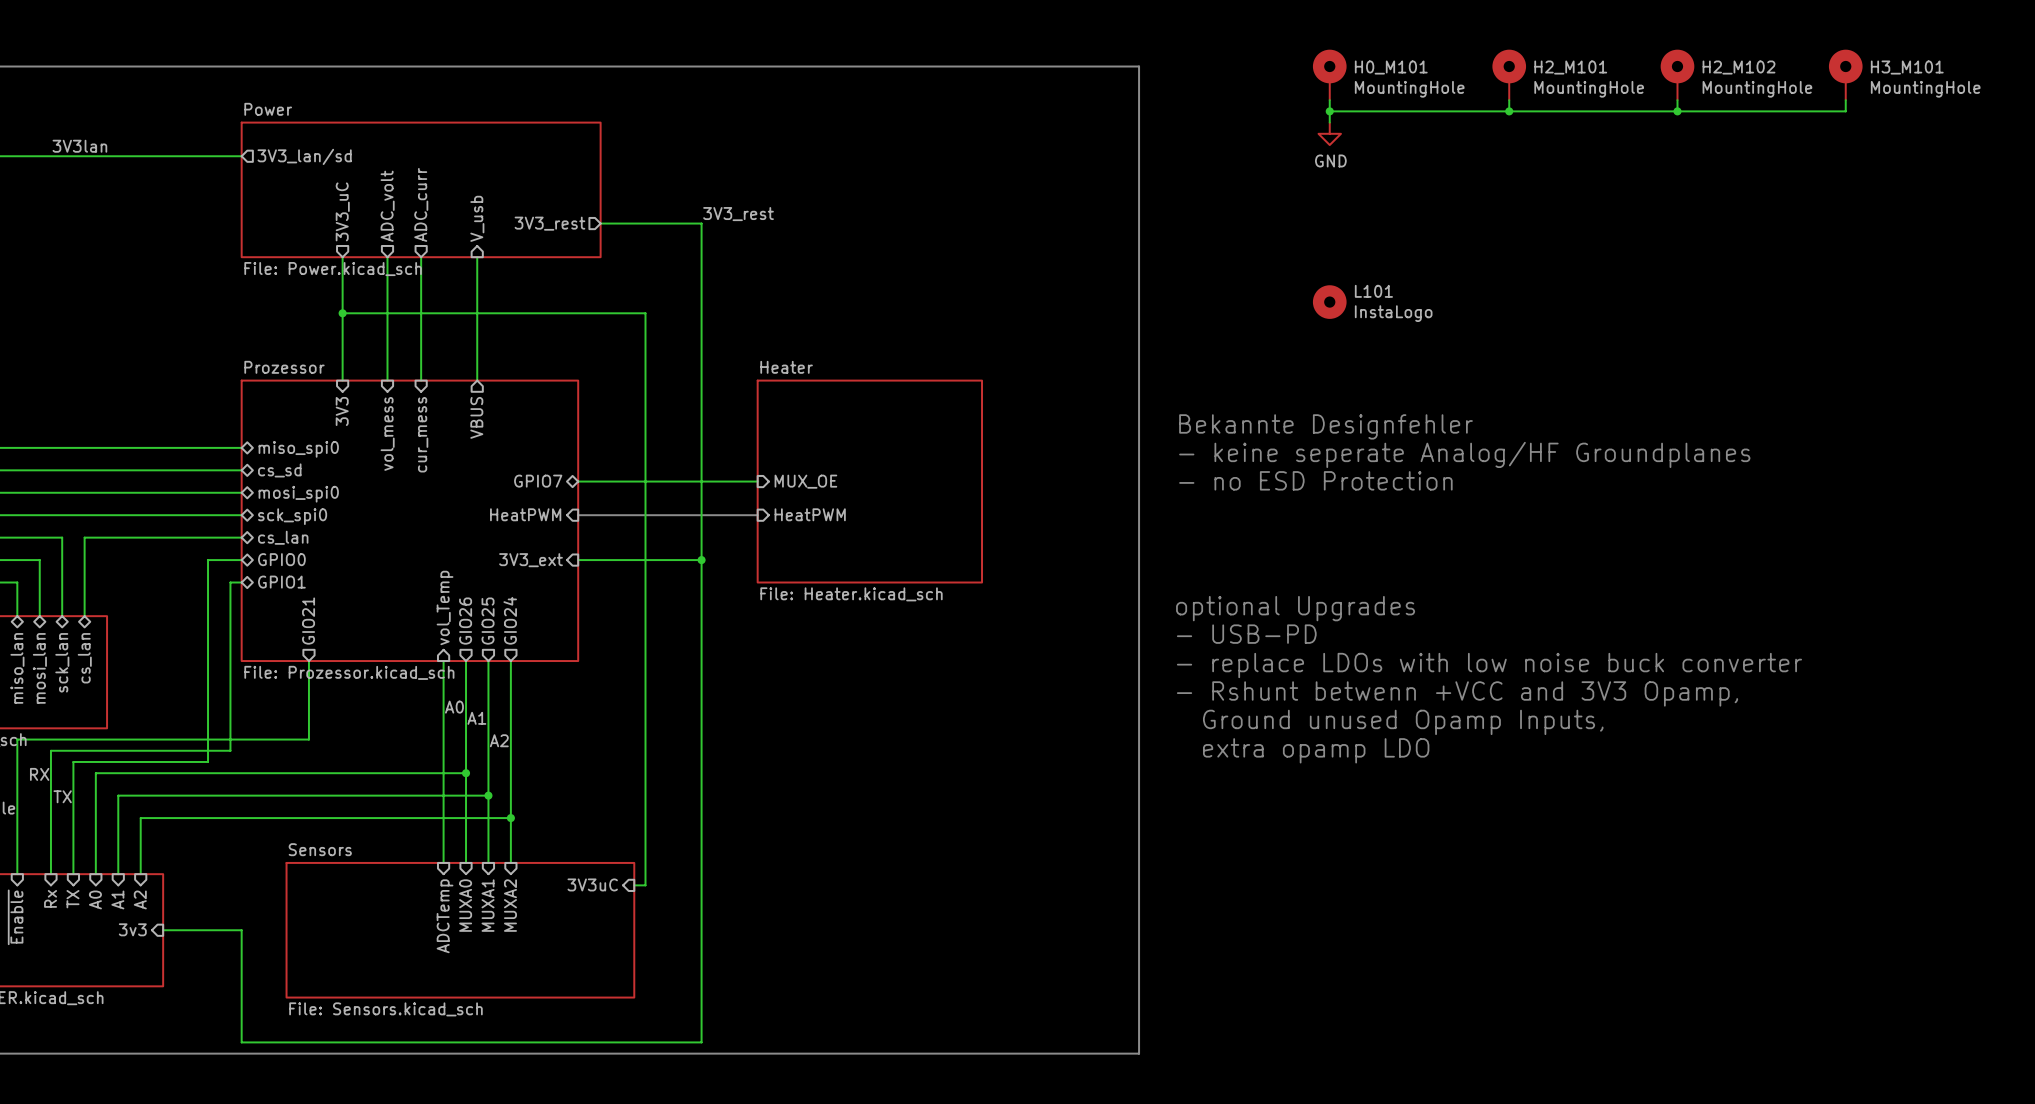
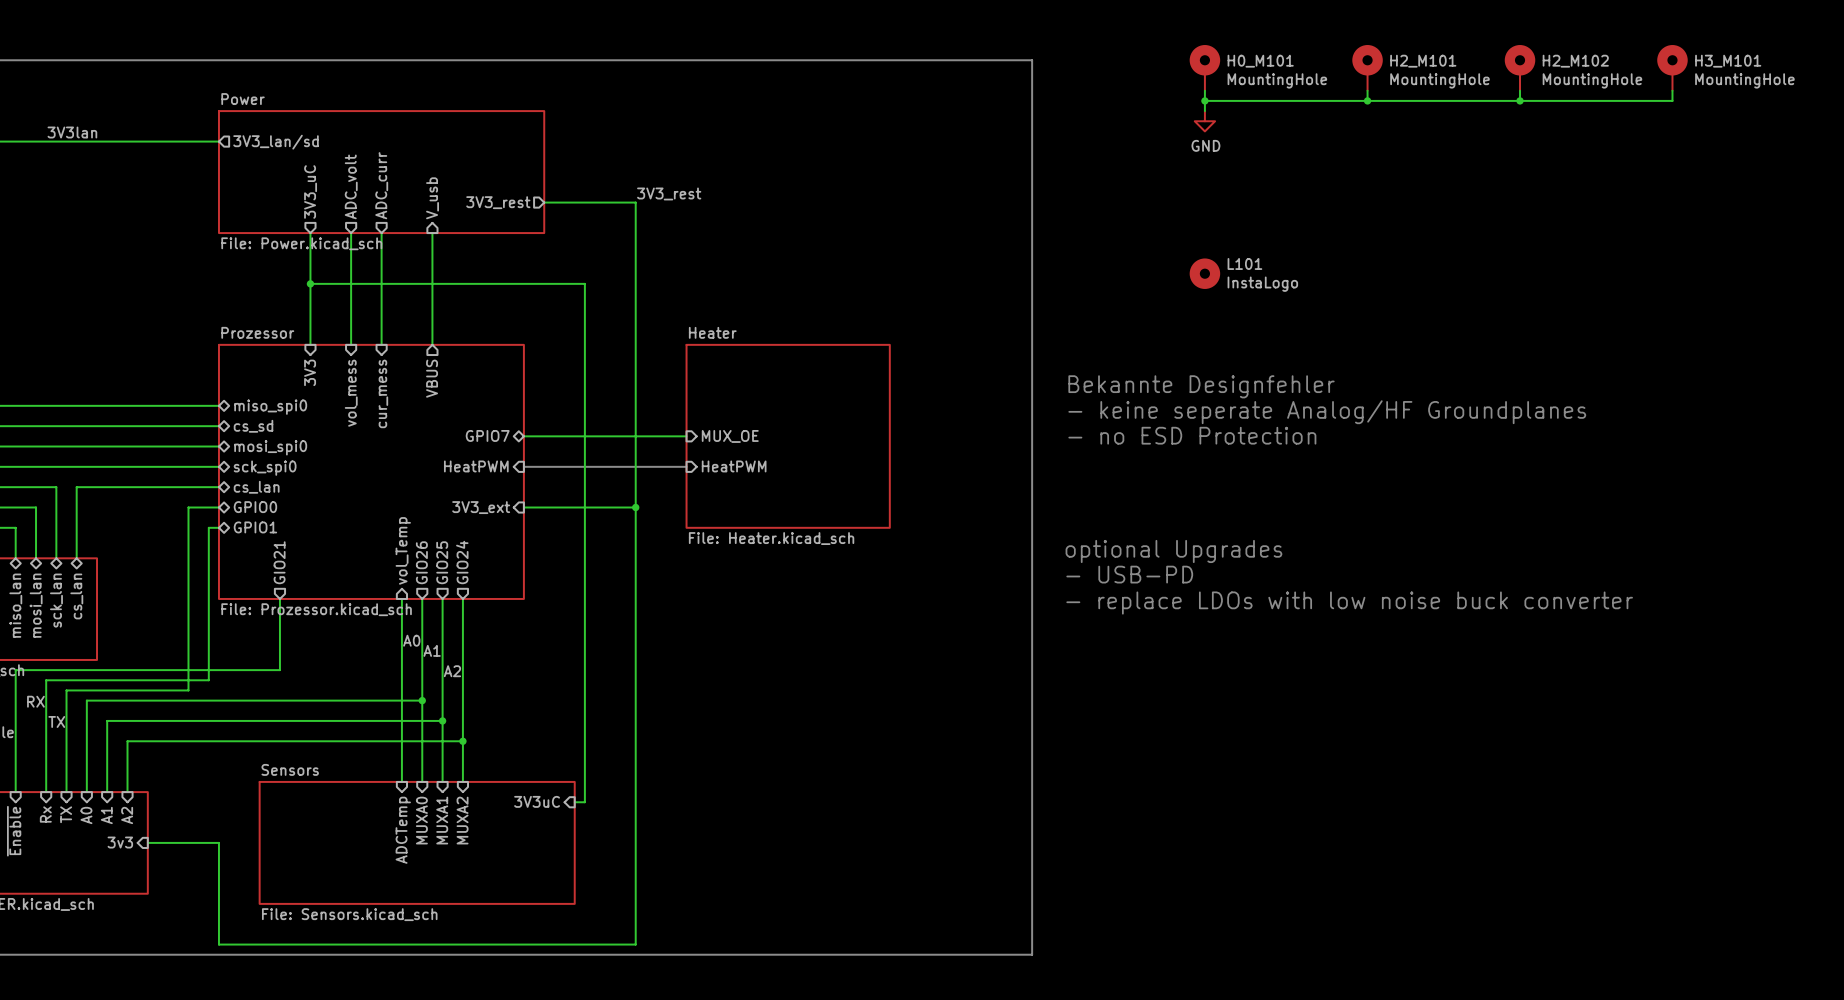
text: - Rshunt betwenn +VCC and 3V3 Opamp, (1457, 693) -> none
text: Ground unused Opamp Inputs, (1403, 722) -> none
text: extra opamp LDO (1316, 750) -> none

